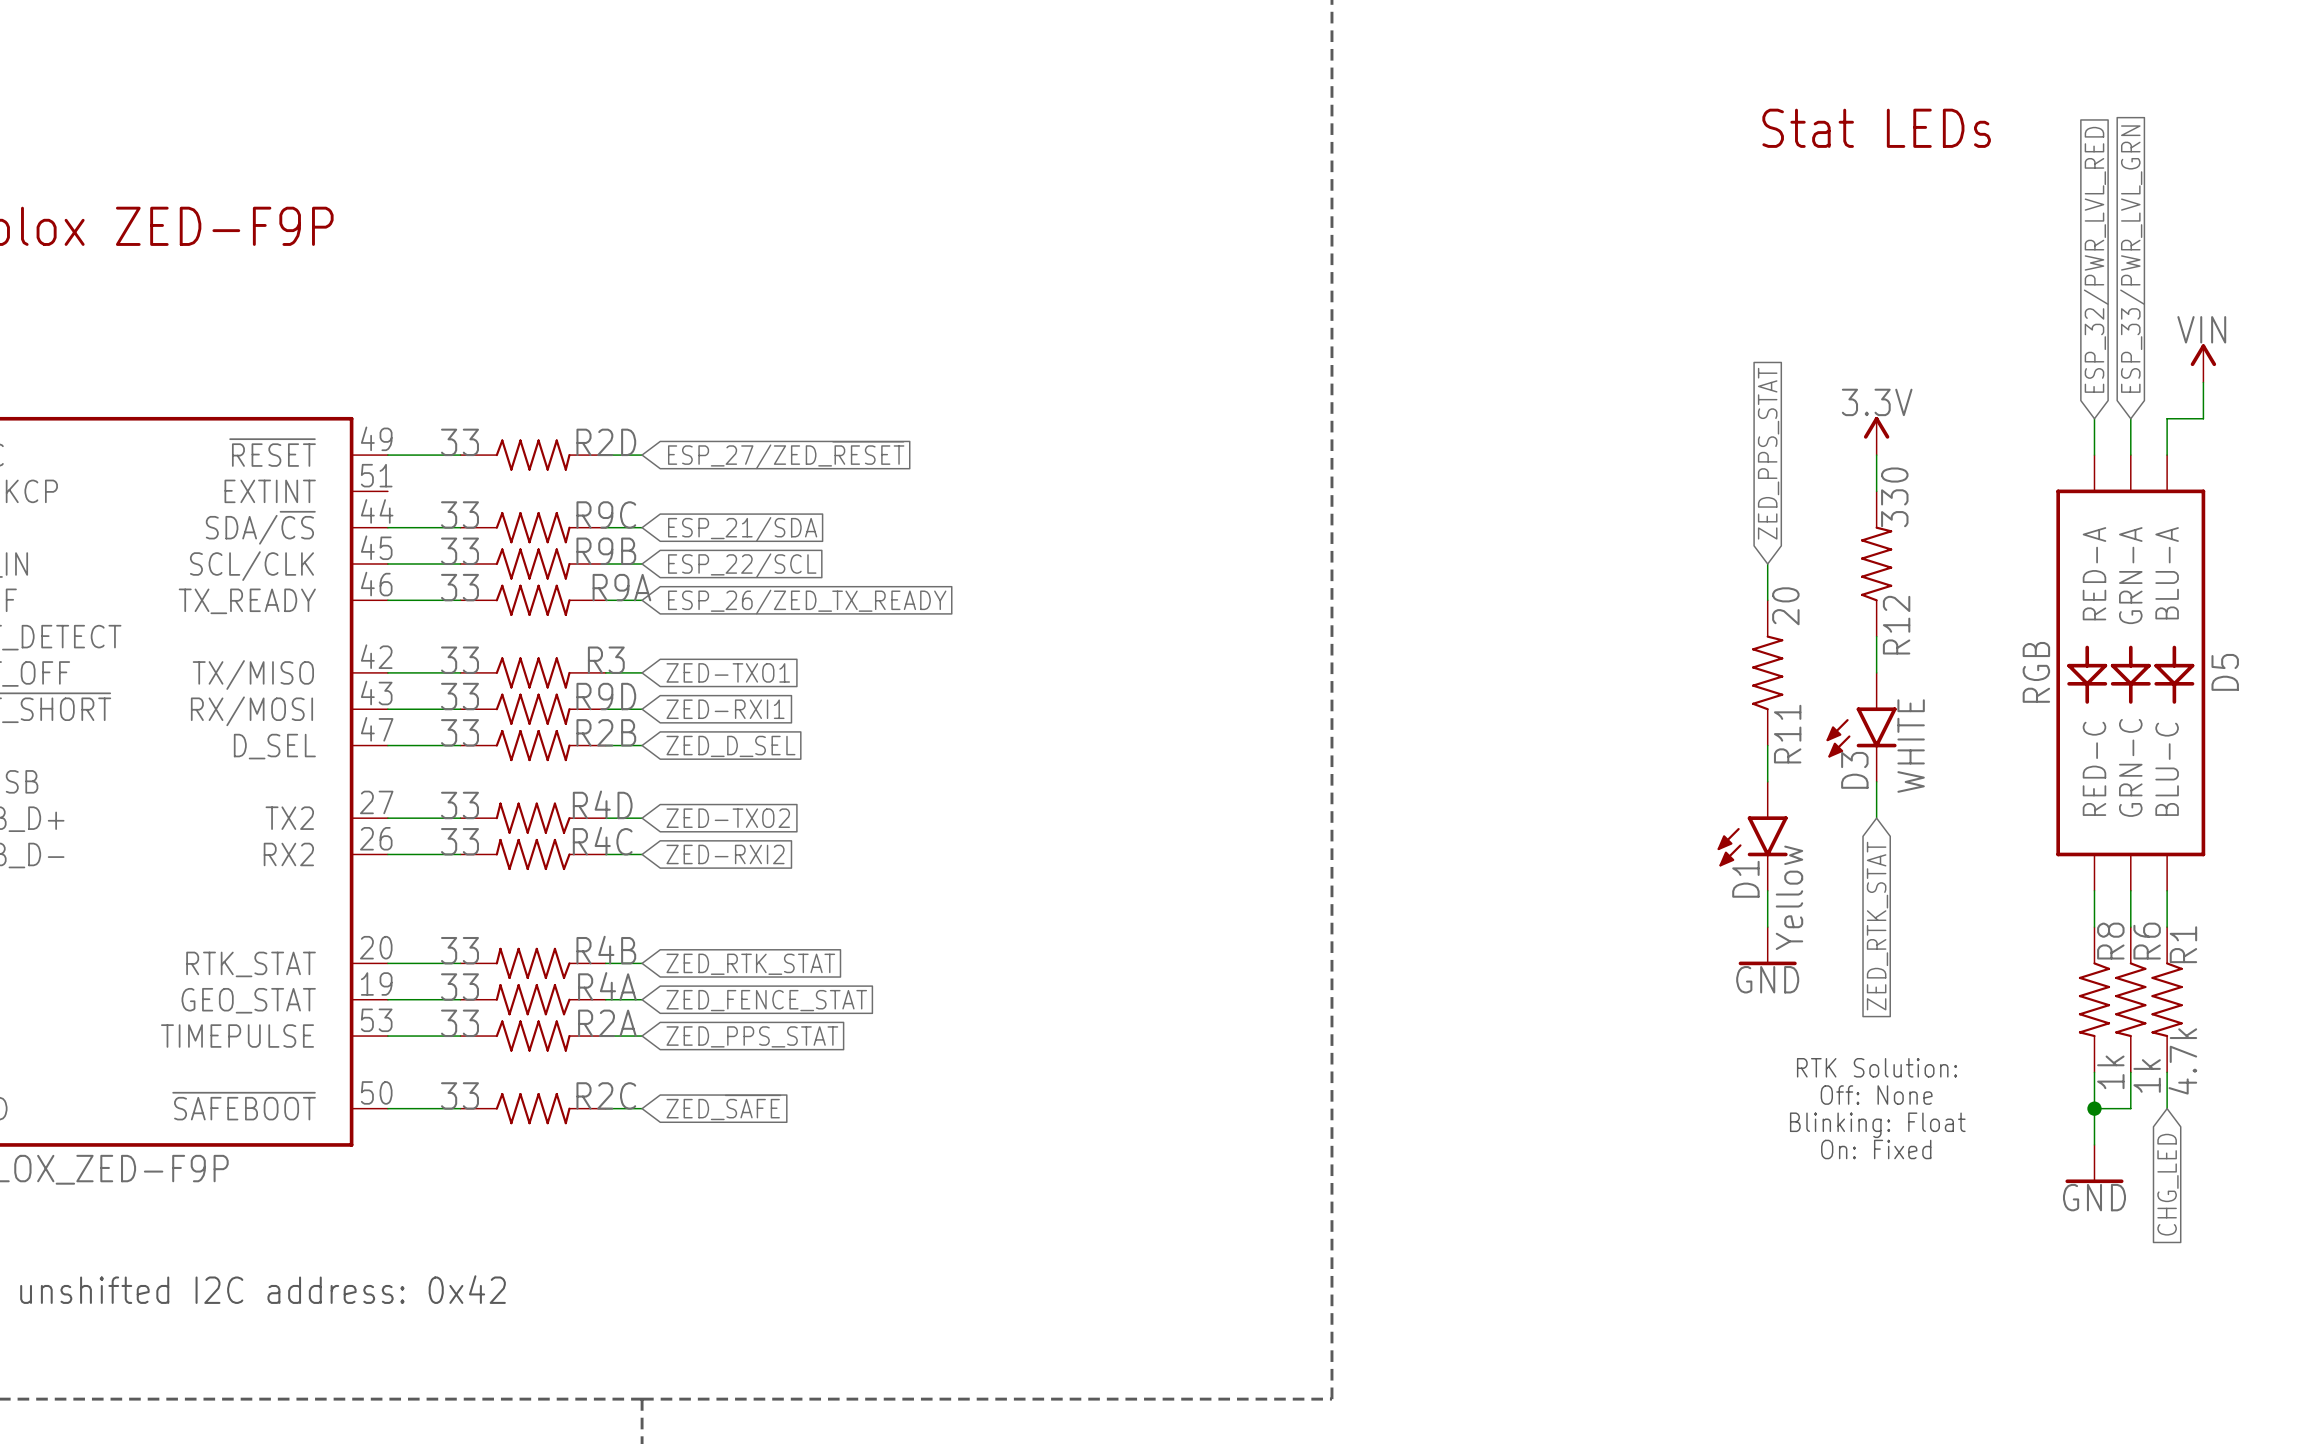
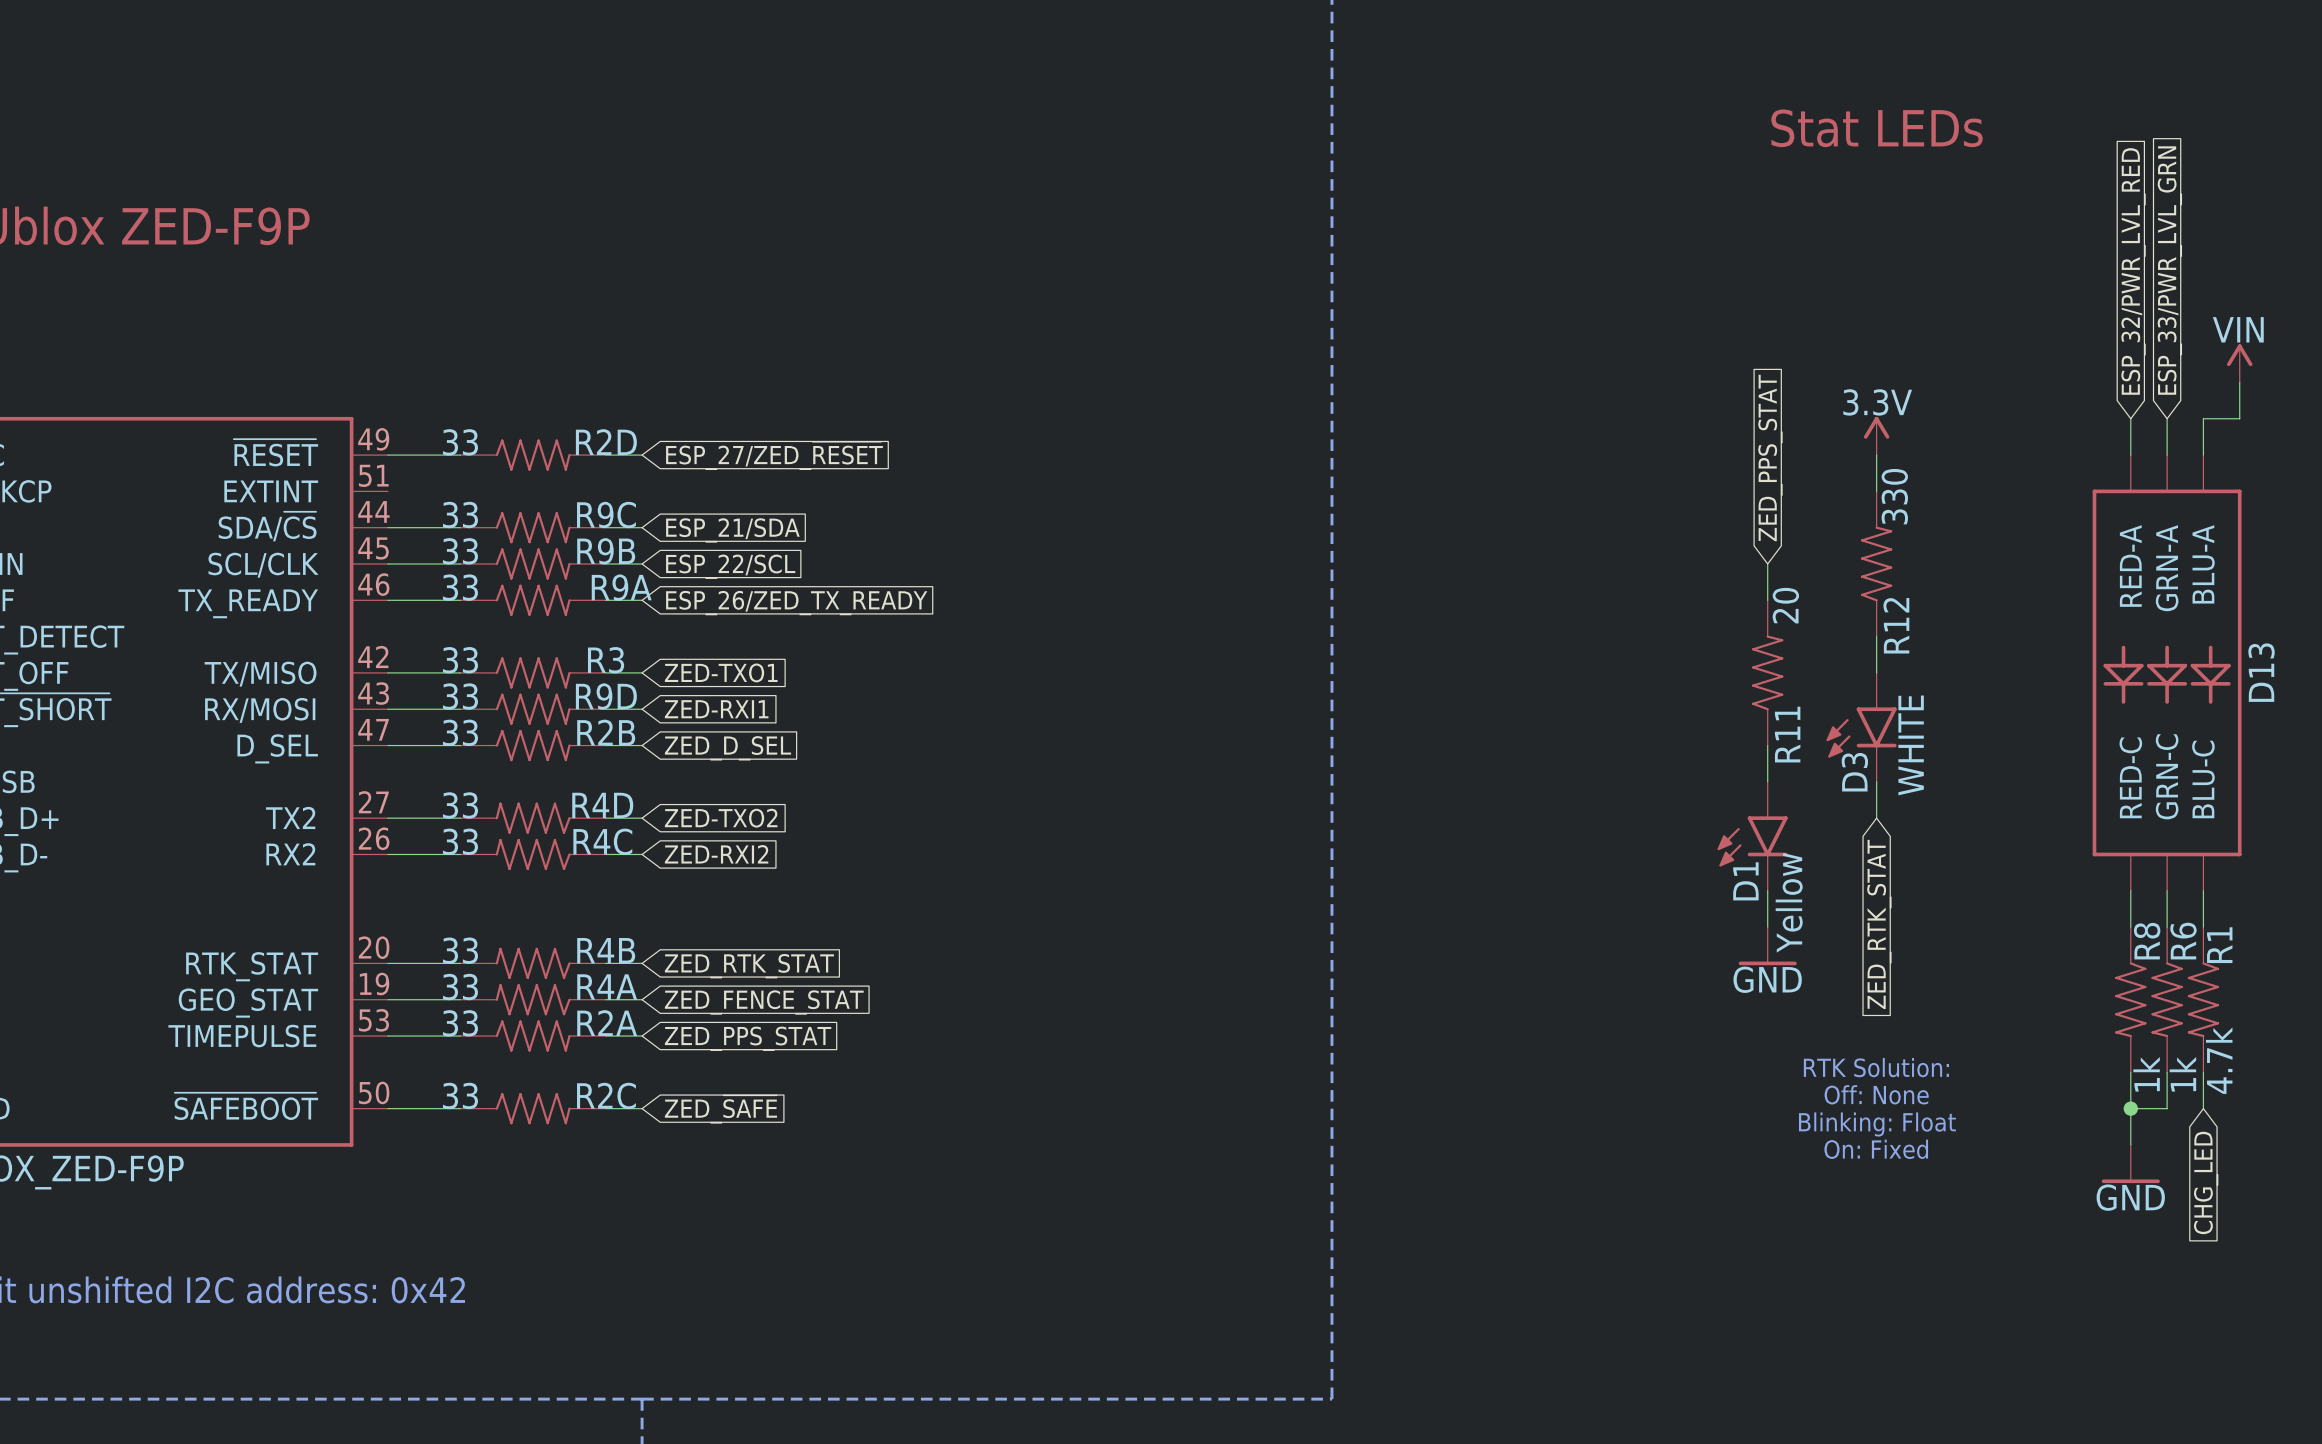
global label: ESP_32/PWR_LVL_RED (2096, 259) -> none
global label: ESP_33/PWR_LVL_GRN (2132, 259) -> ESP_32/PWR_LVL_RED (2133, 271)
global label: none -> ESP_33/PWR_LVL_GRN (2169, 270)
power symbol position: VIN (2203, 363) -> VIN (2239, 363)
wire: (2203, 382) (2203, 418) (2167, 418) -> none
wire: none -> (2239, 382) (2239, 418) (2203, 418) (2203, 455)
wire: (2094, 418) (2094, 455) -> none
D5: RGB (2130, 672) -> none
D13: none -> (2167, 672)
wire: (2094, 890) (2094, 927) -> (2203, 890) (2203, 927)
R6 name: R6 (2147, 941) -> R8 (2147, 941)
R1 name: R1 (2183, 944) -> R6 (2183, 941)
R8: 1k (2094, 999) -> none
R1: none -> 4.7k (2203, 999)
R1 value: 4.7k (2182, 1061) -> 1k (2182, 1074)
wire: (2094, 1072) (2094, 1144) -> none
wire: none -> (2203, 1072) (2203, 1108)
wire: (2094, 1108) (2130, 1108) -> none
junction position: (2094, 1108) -> (2130, 1108)
wire: none -> (2167, 1108) (2130, 1108) (2130, 1144)
power symbol position: GND (2094, 1164) -> GND (2130, 1164)
global label position: CHG_LED (2167, 1184) -> CHG_LED (2206, 1182)

